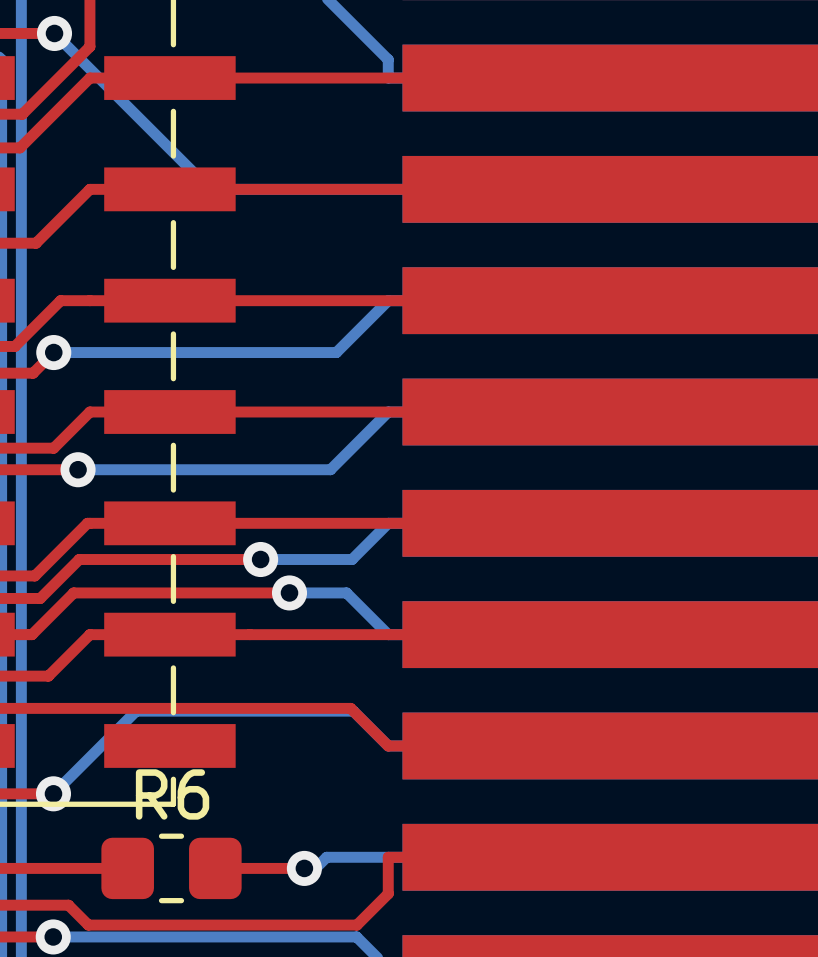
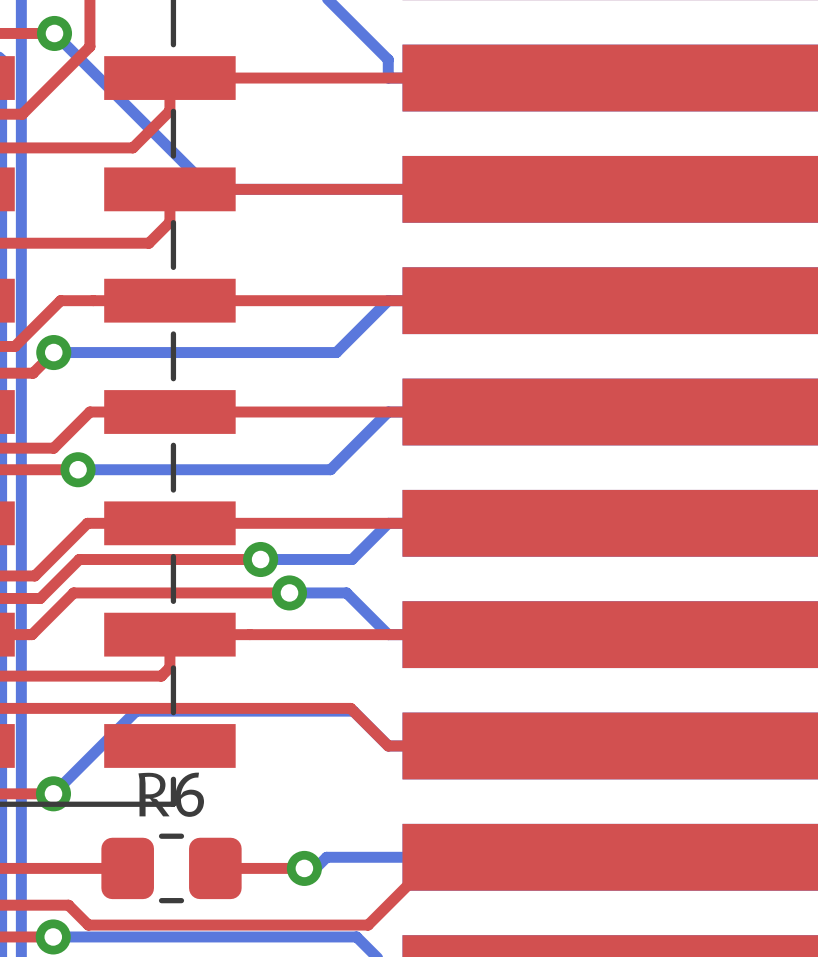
top track: (169, 78) (89, 78) (20, 147) -> (169, 78) (169, 110) (132, 147) (20, 147)
top track: (169, 189) (89, 189) (36, 243) -> (169, 189) (169, 222) (148, 243) (36, 243)
top track: (169, 634) (89, 634) (48, 676) -> (169, 634) (169, 667) (161, 676) (48, 676)
top track: (435, 857) (388, 857) (388, 893) (356, 925) -> (435, 857) (368, 925) (356, 925)

